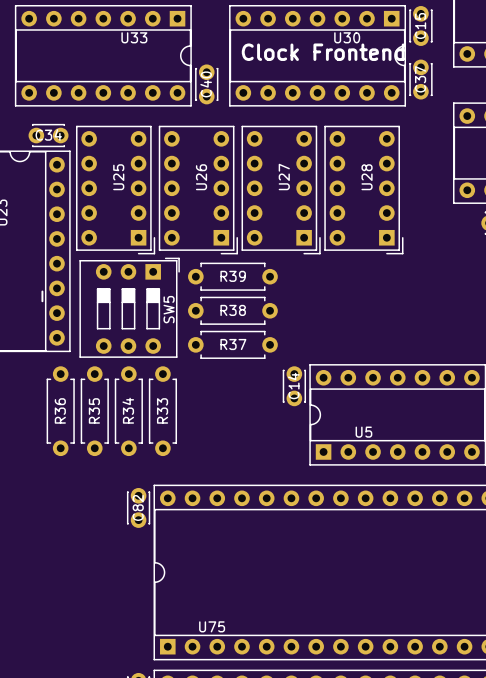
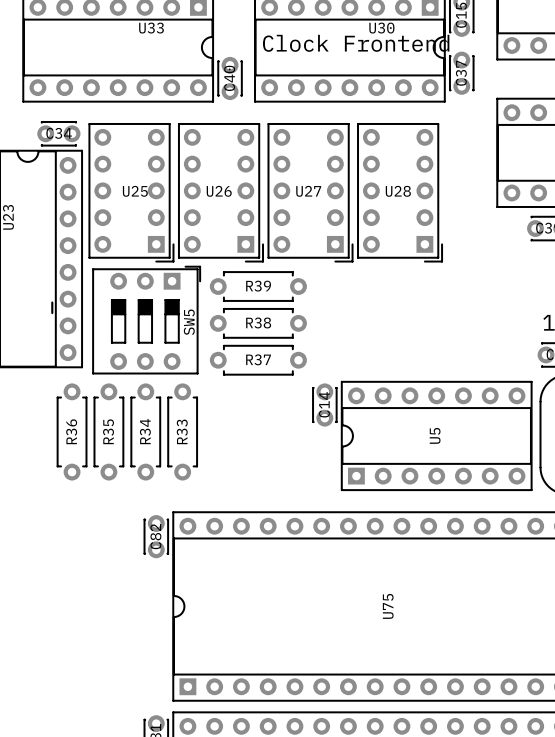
U27 name rotation: 0° (284, 176) -> 90° clockwise (308, 191)
U25 name rotation: 0° (118, 177) -> 90° clockwise (135, 191)
U26 name rotation: 0° (201, 177) -> 90° clockwise (219, 191)
U28 name rotation: 0° (367, 177) -> 90° clockwise (398, 191)
U5 name rotation: 0° (363, 432) -> 90° counterclockwise (435, 435)
U5 name position: U5 (363, 432) -> U5 (435, 435)
U75 name rotation: 0° (212, 626) -> 90° counterclockwise (388, 606)
U75 name position: U75 (212, 626) -> U75 (388, 606)

